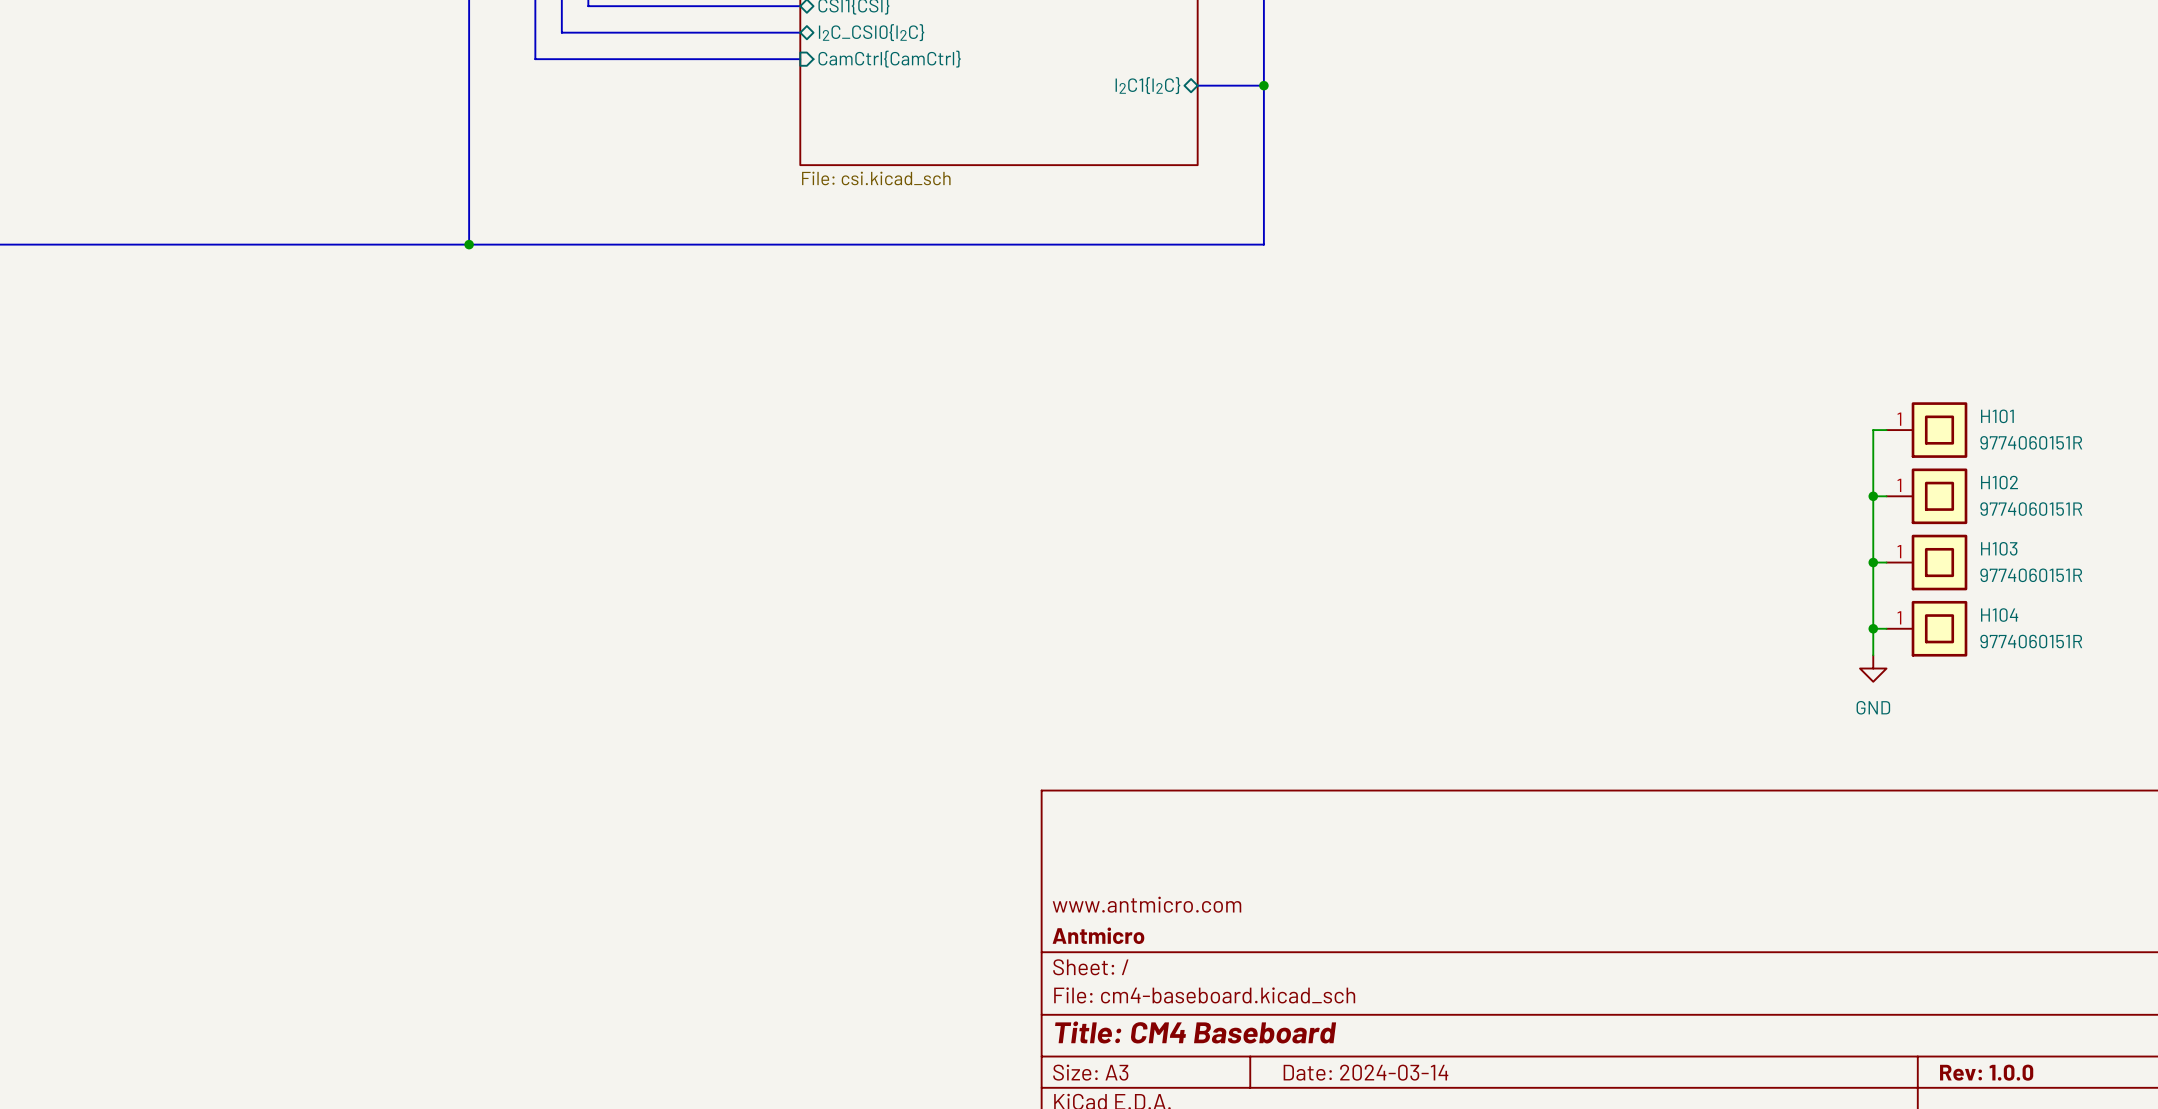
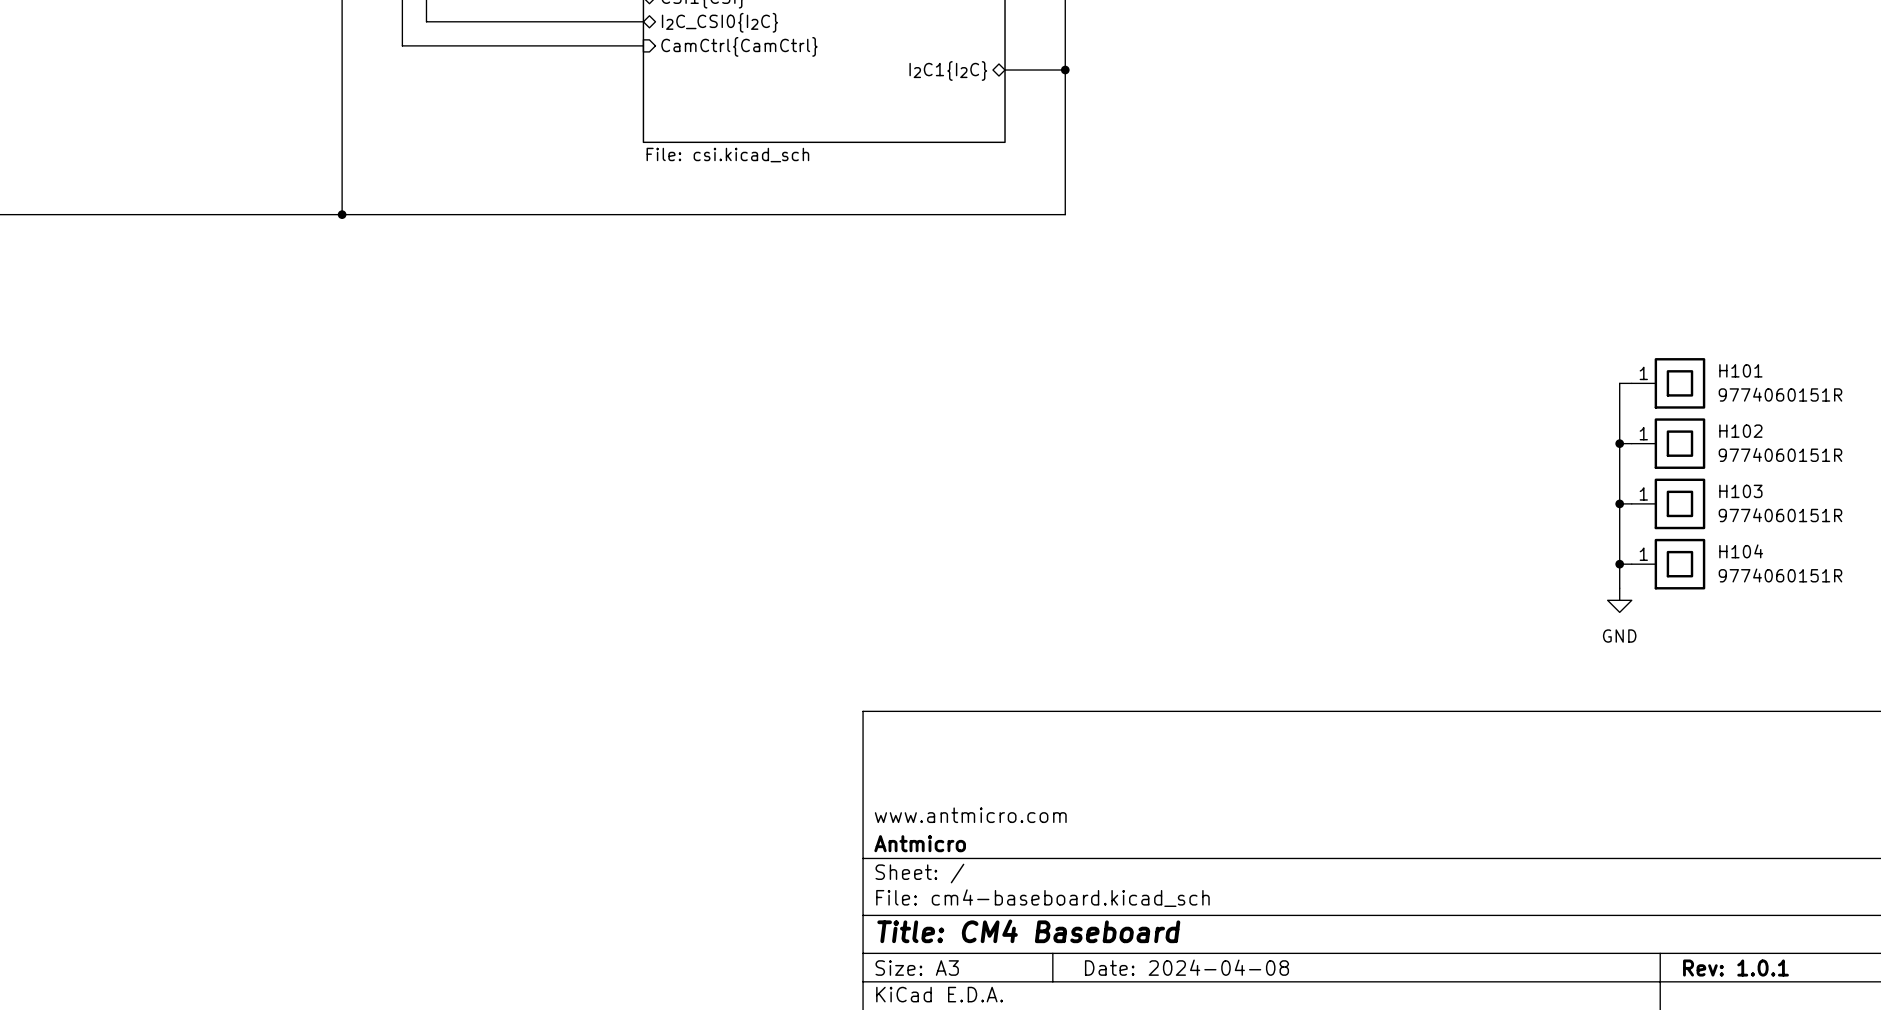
title block: Date: 2024-03-14 (1365, 1072) -> Date: 2024-04-08 (1186, 967)
title block: Rev: 1.0.0 (1986, 1072) -> Rev: 1.0.1 (1735, 968)

